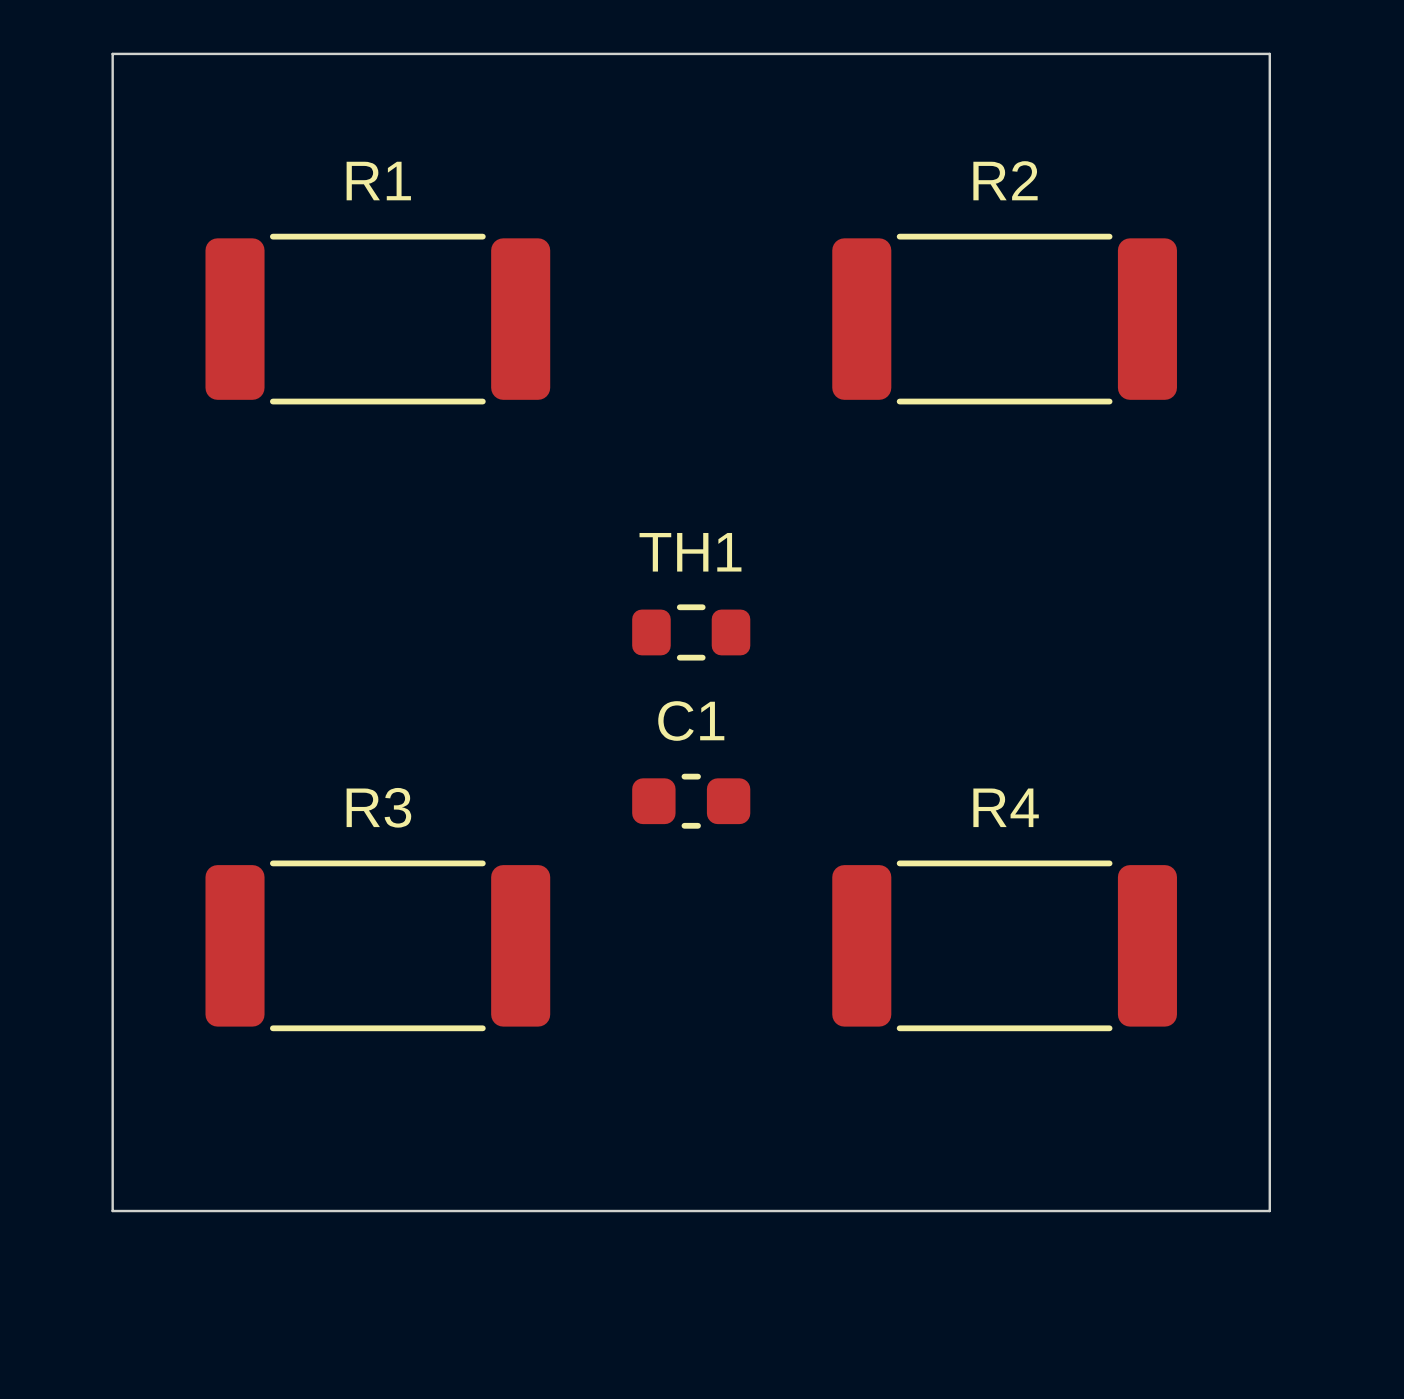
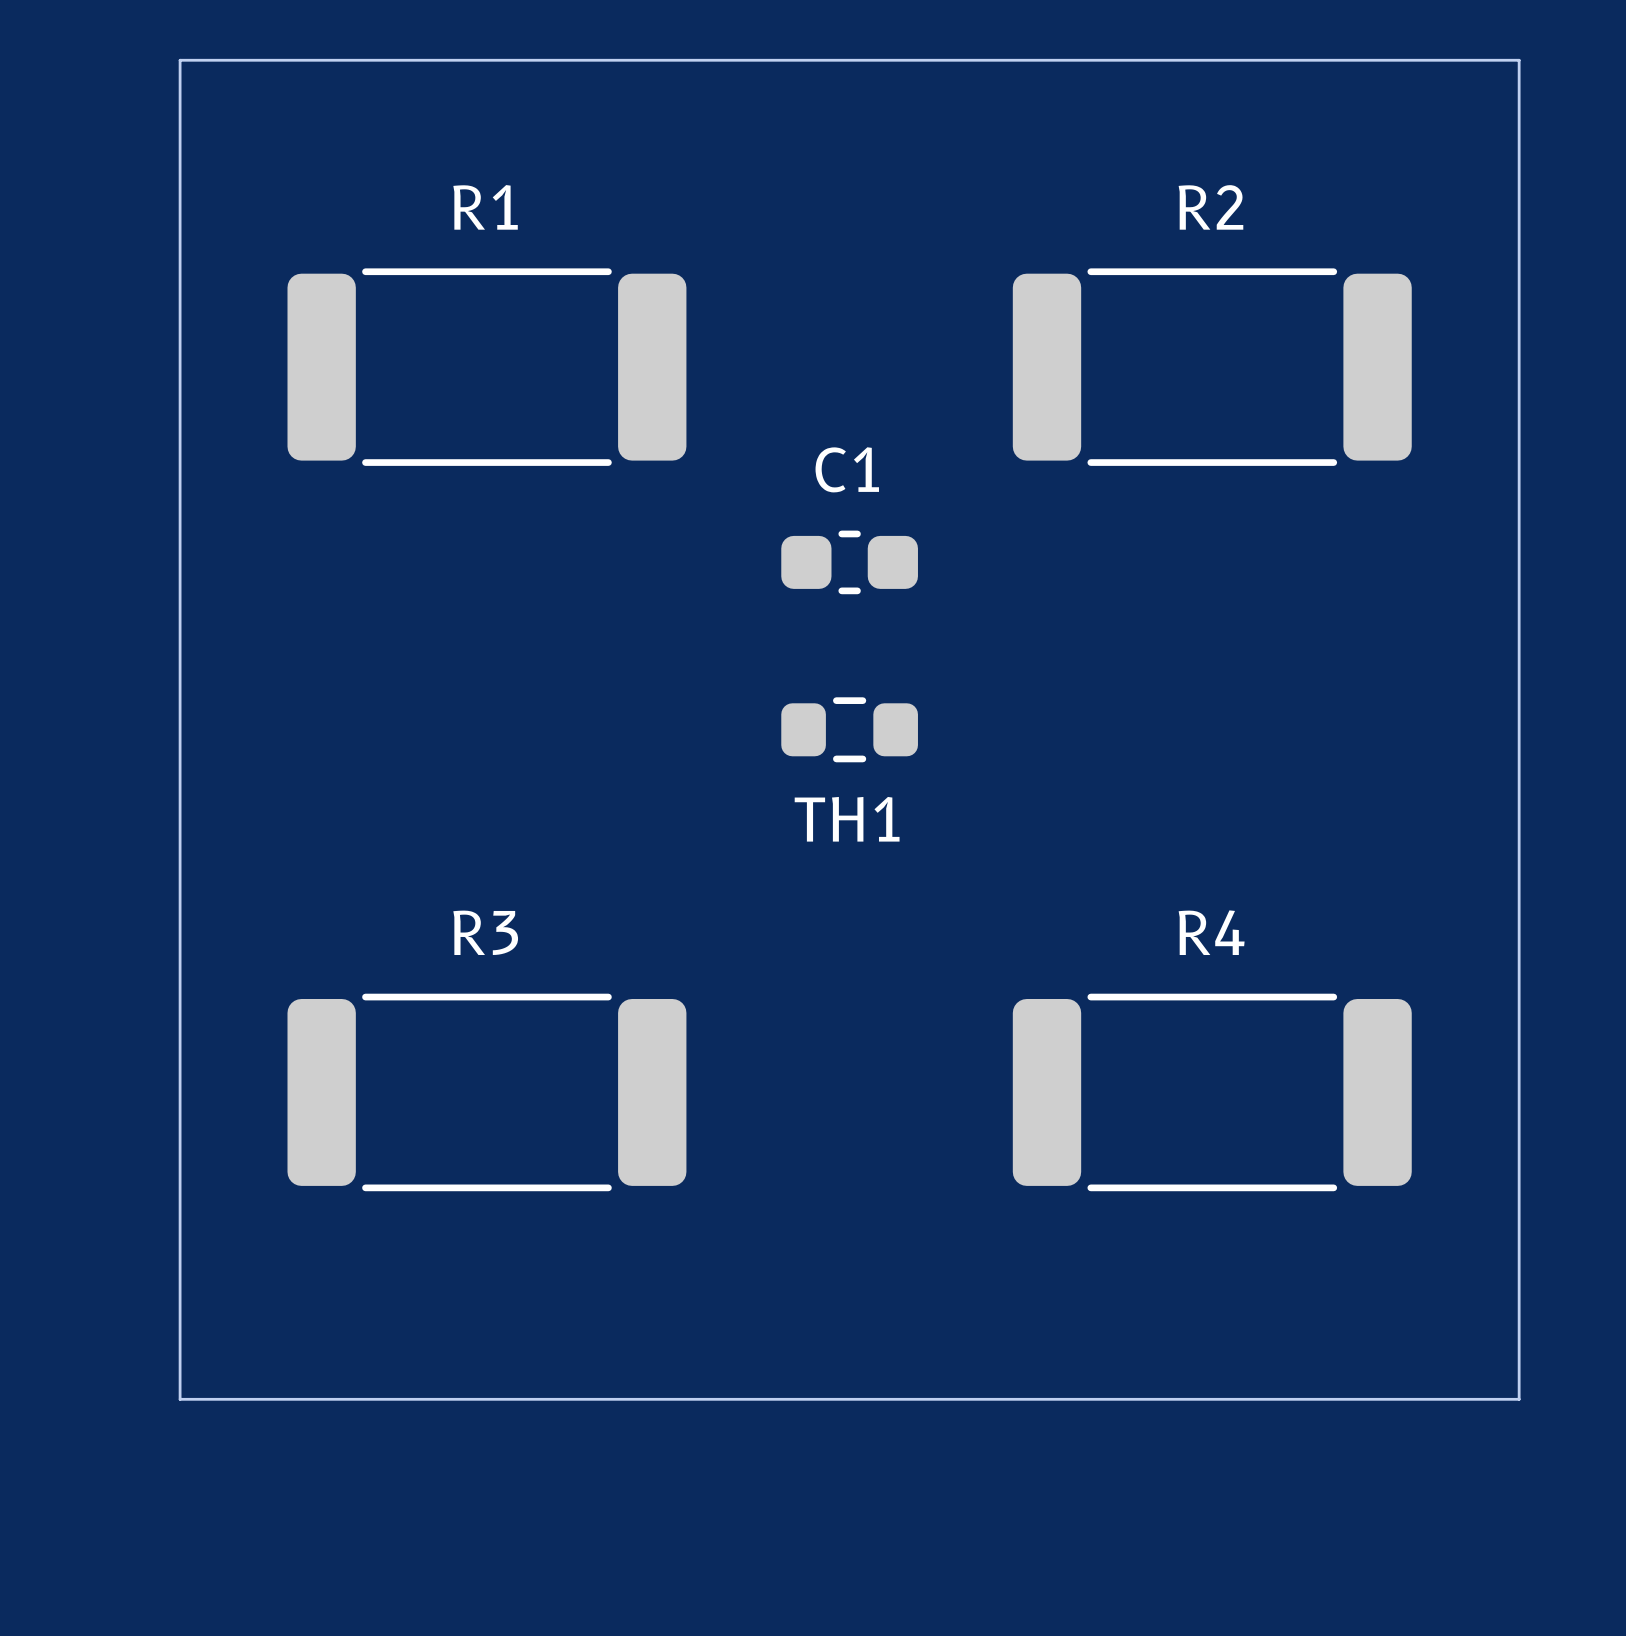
TH1 name position: TH1 (690, 552) -> TH1 (847, 819)
C1 position: (691, 801) -> (849, 562)

